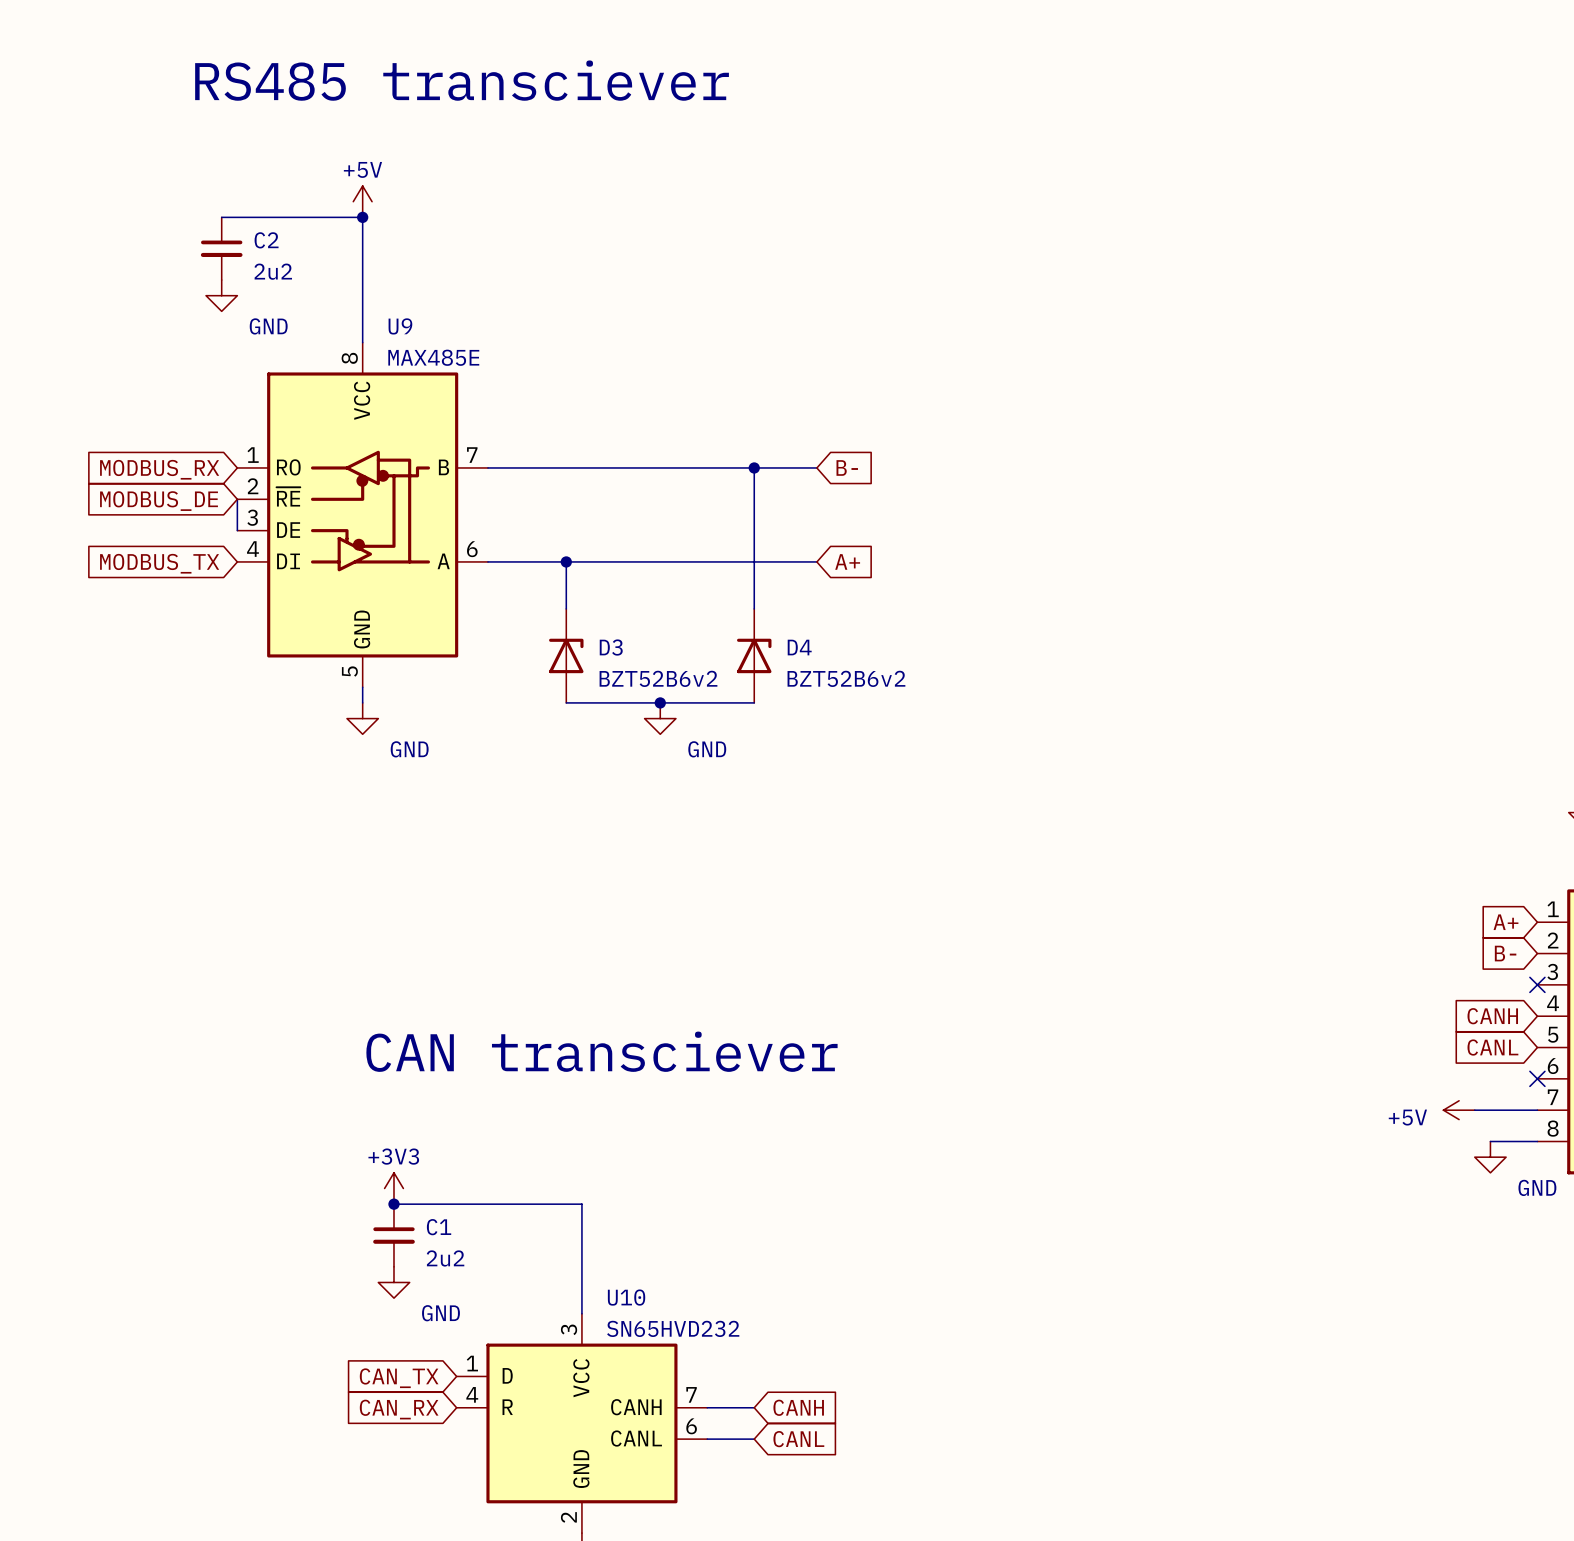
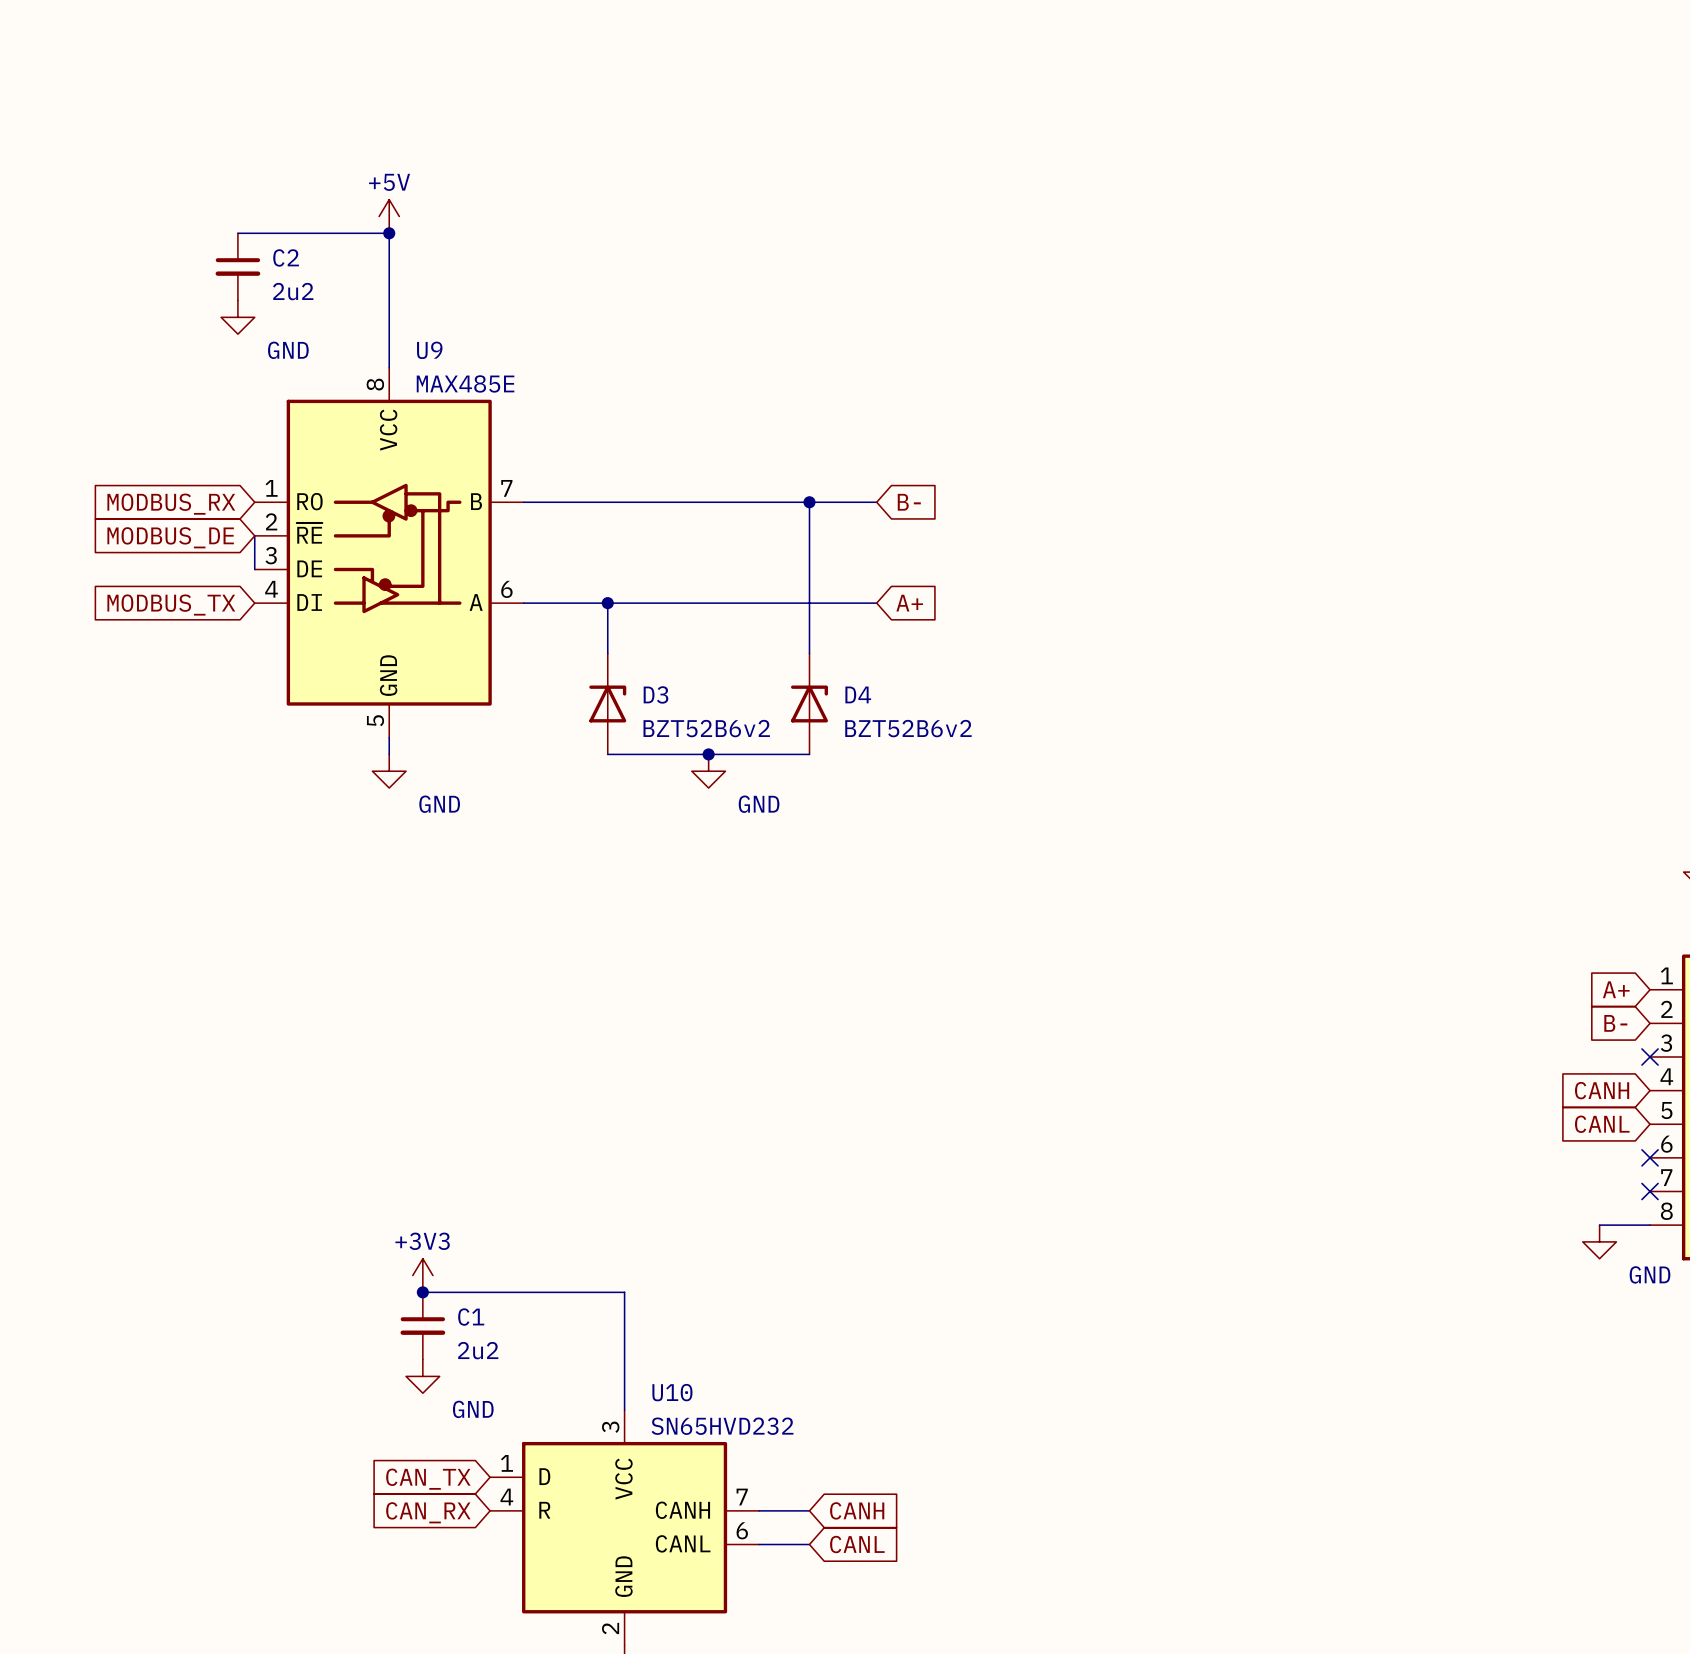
text: RS485 transciever (462, 80) -> none
text: CAN transciever (601, 1051) -> none
power symbol: +5V (1459, 1110) -> none
wire: (1474, 1110) (1537, 1110) -> none
no-connect mark: none -> (1650, 1191)

